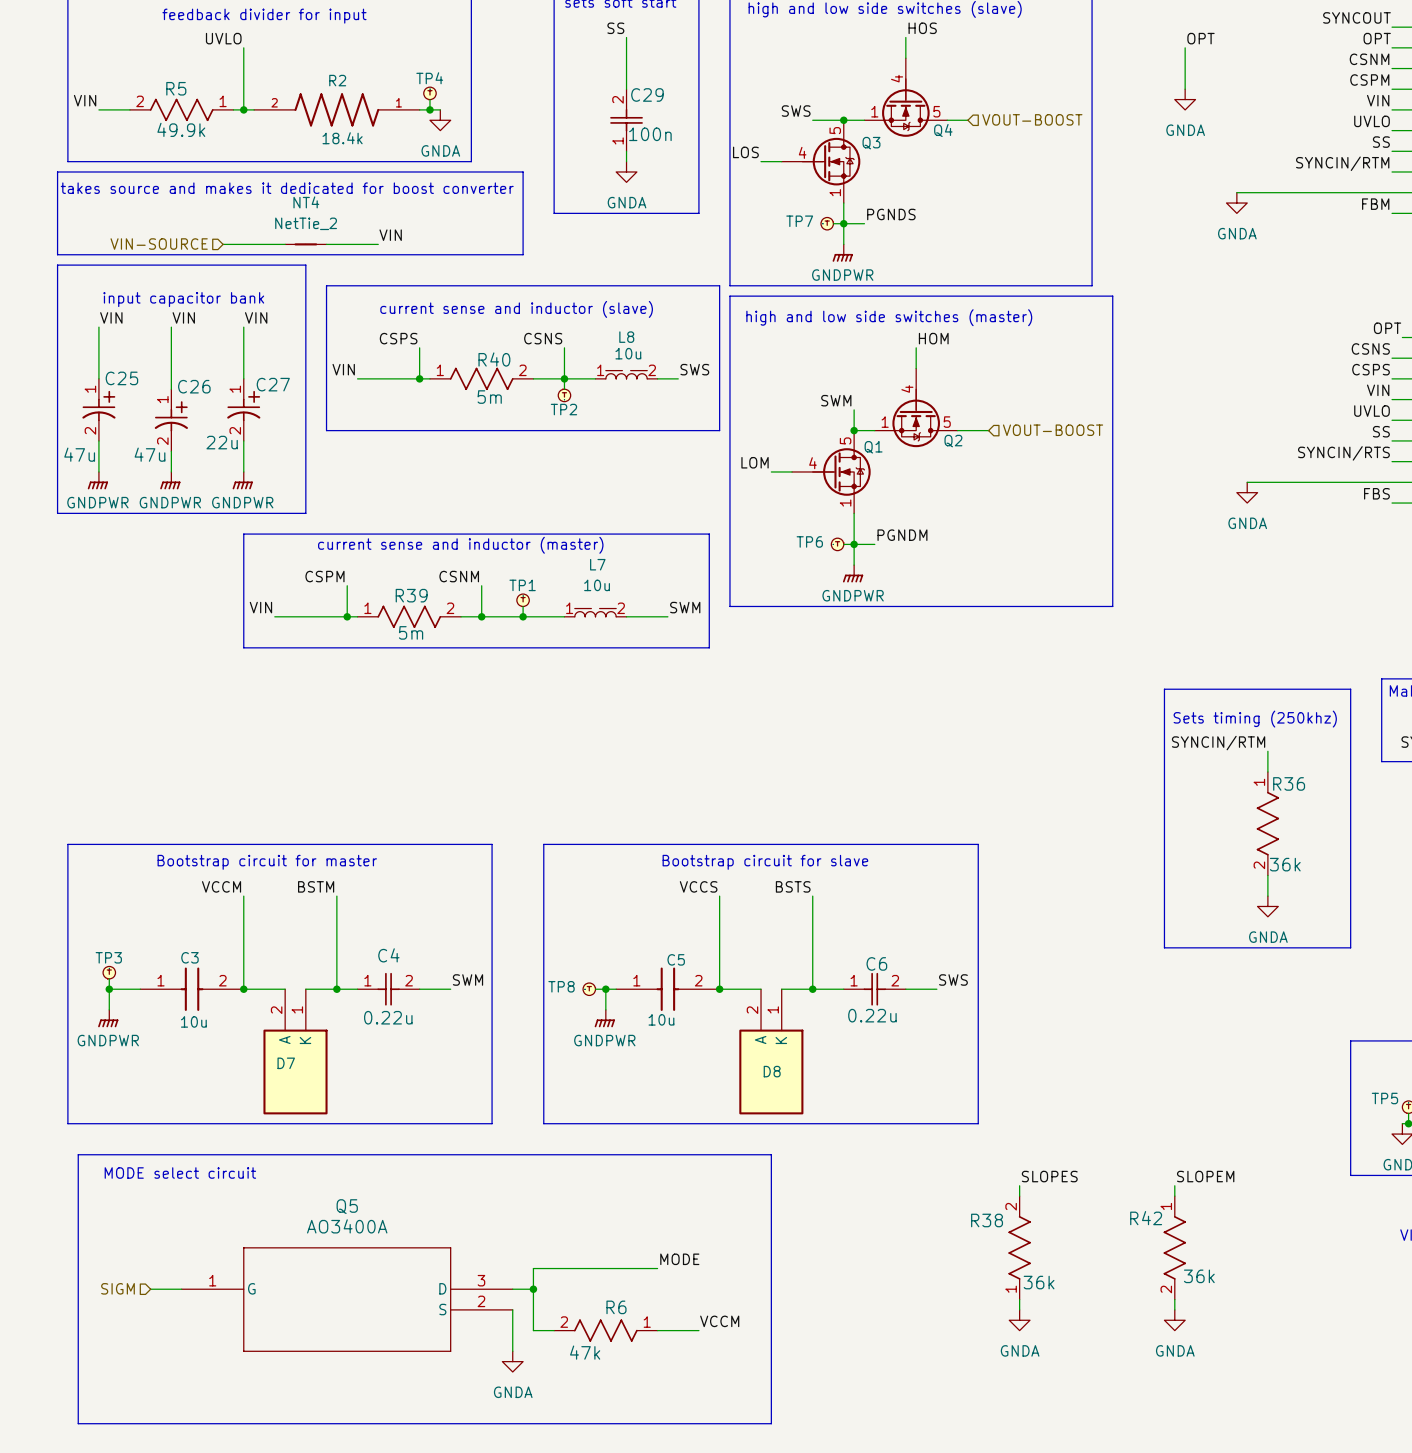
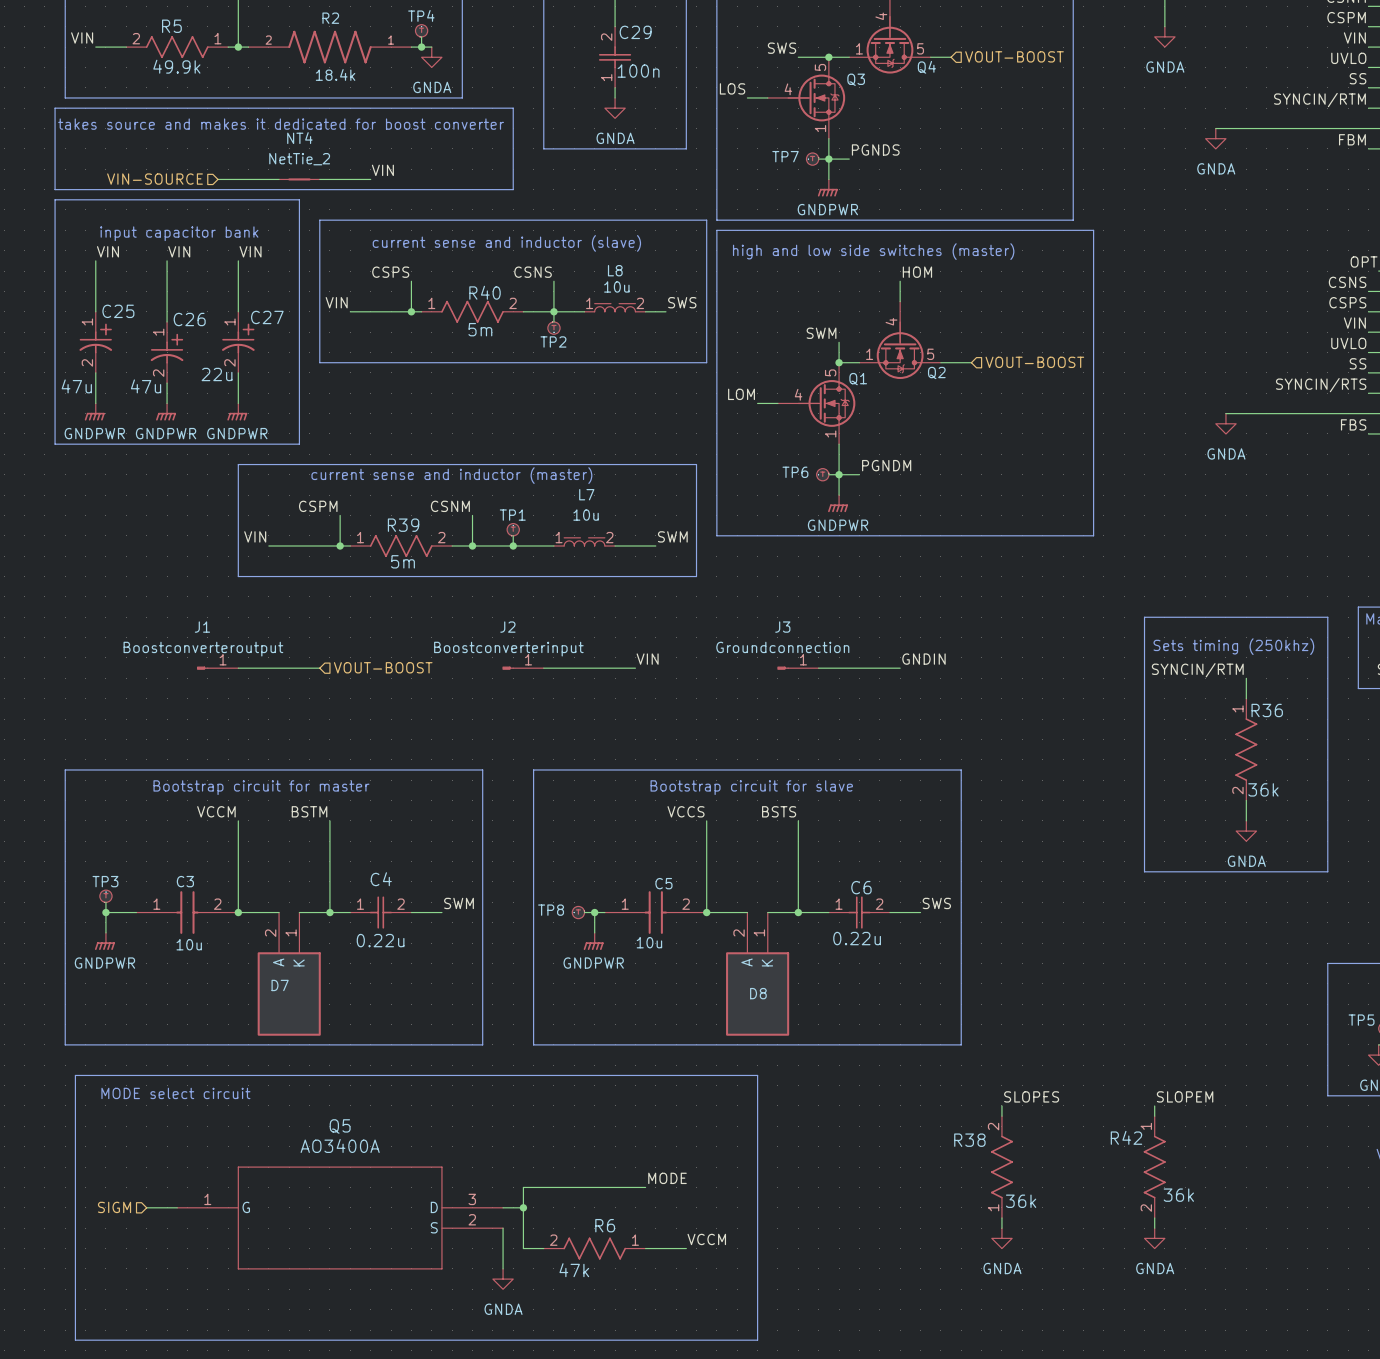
label: none -> VIN (647, 659)
label: none -> GNDIN (923, 659)
J1: none -> Boostconverteroutput (217, 668)
wire: none -> (238, 668) (319, 668)
hierarchical label: none -> VOUT-BOOST (383, 667)
J2: none -> Boostconverterinput (523, 668)
wire: none -> (543, 668) (635, 668)
J3: none -> Groundconnection (798, 668)
wire: none -> (818, 668) (900, 668)

